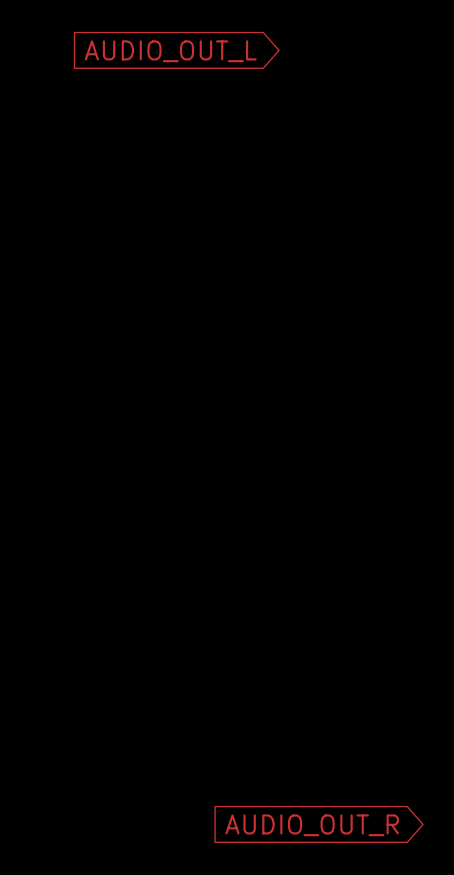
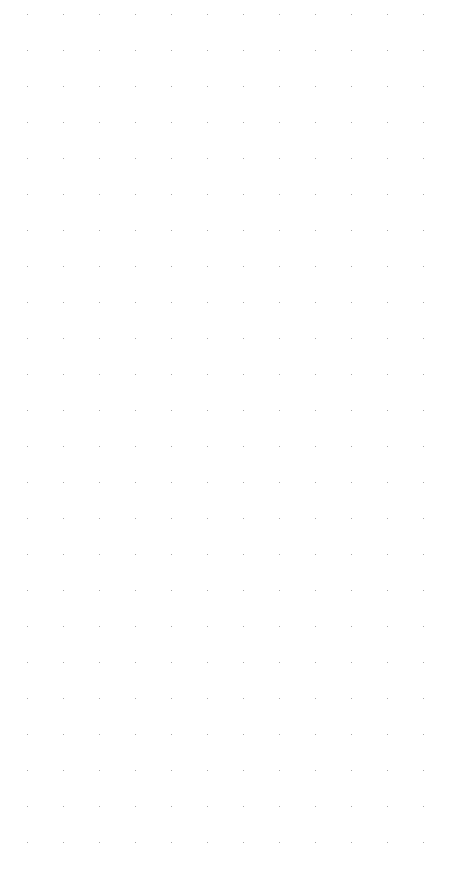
global label: AUDIO_OUT_L (170, 51) -> none
global label: AUDIO_OUT_R (312, 825) -> none

